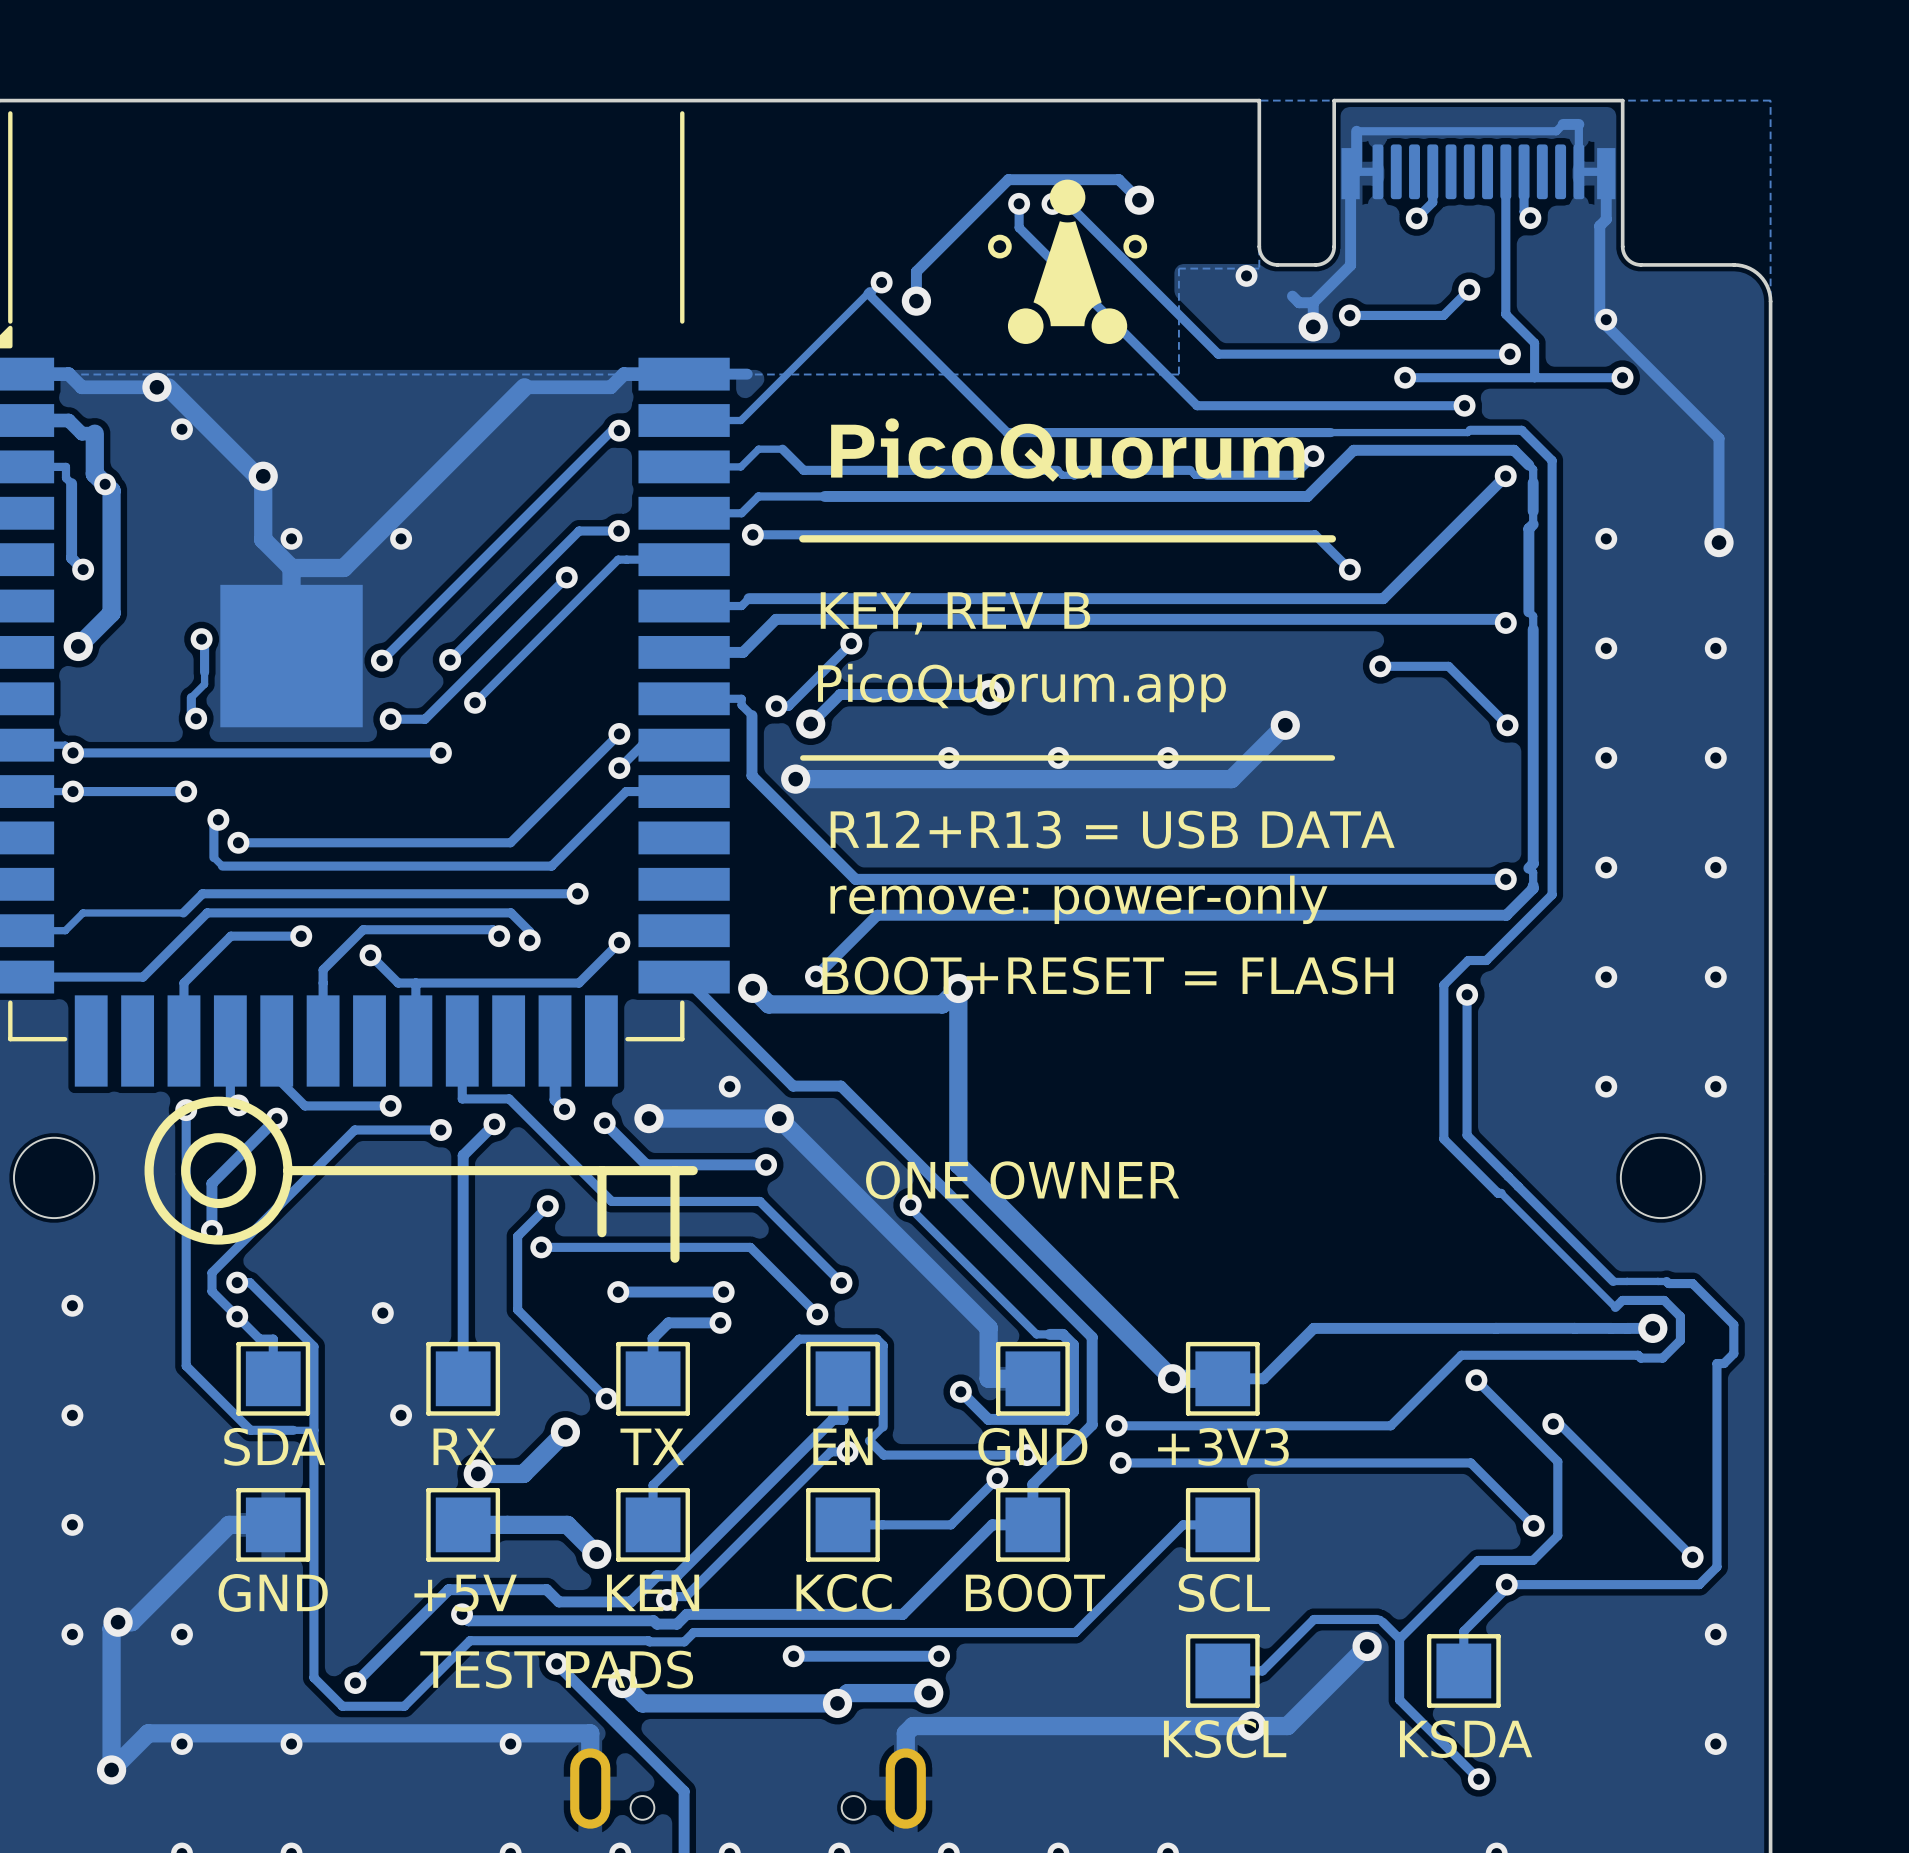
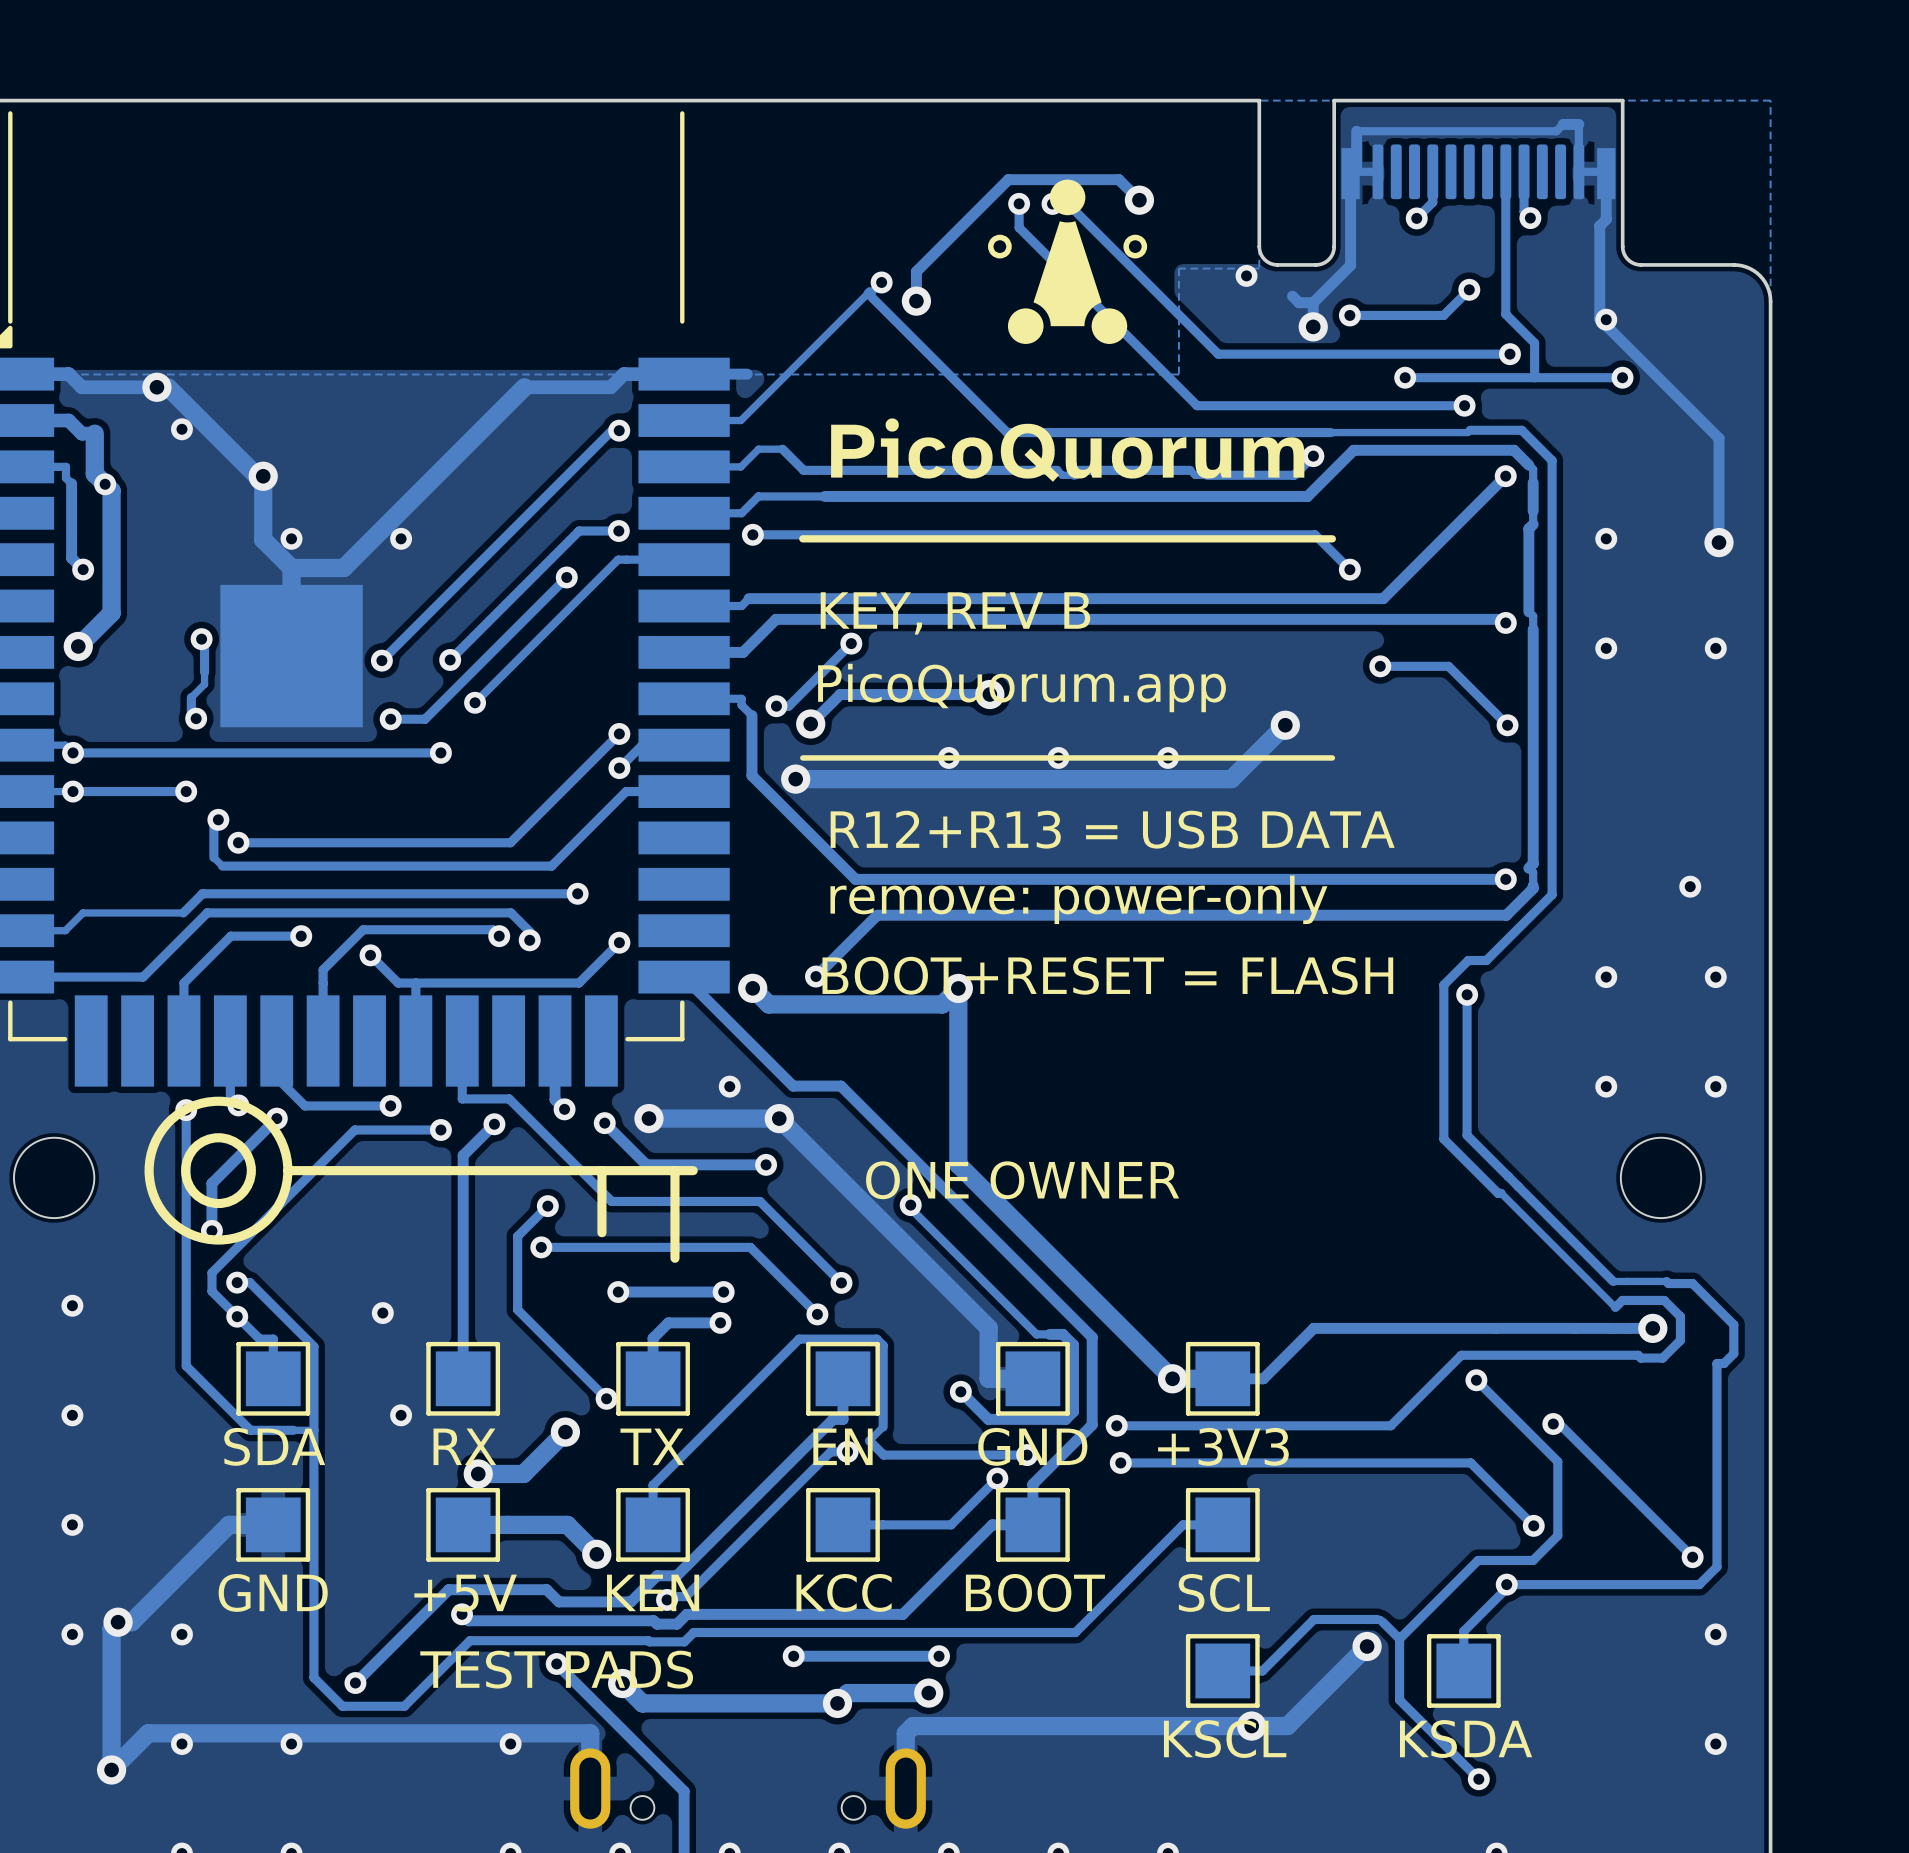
via: (1606, 757) -> none
via: (1715, 757) -> none
via: (1606, 867) -> none
via position: (1715, 867) -> (1690, 886)

